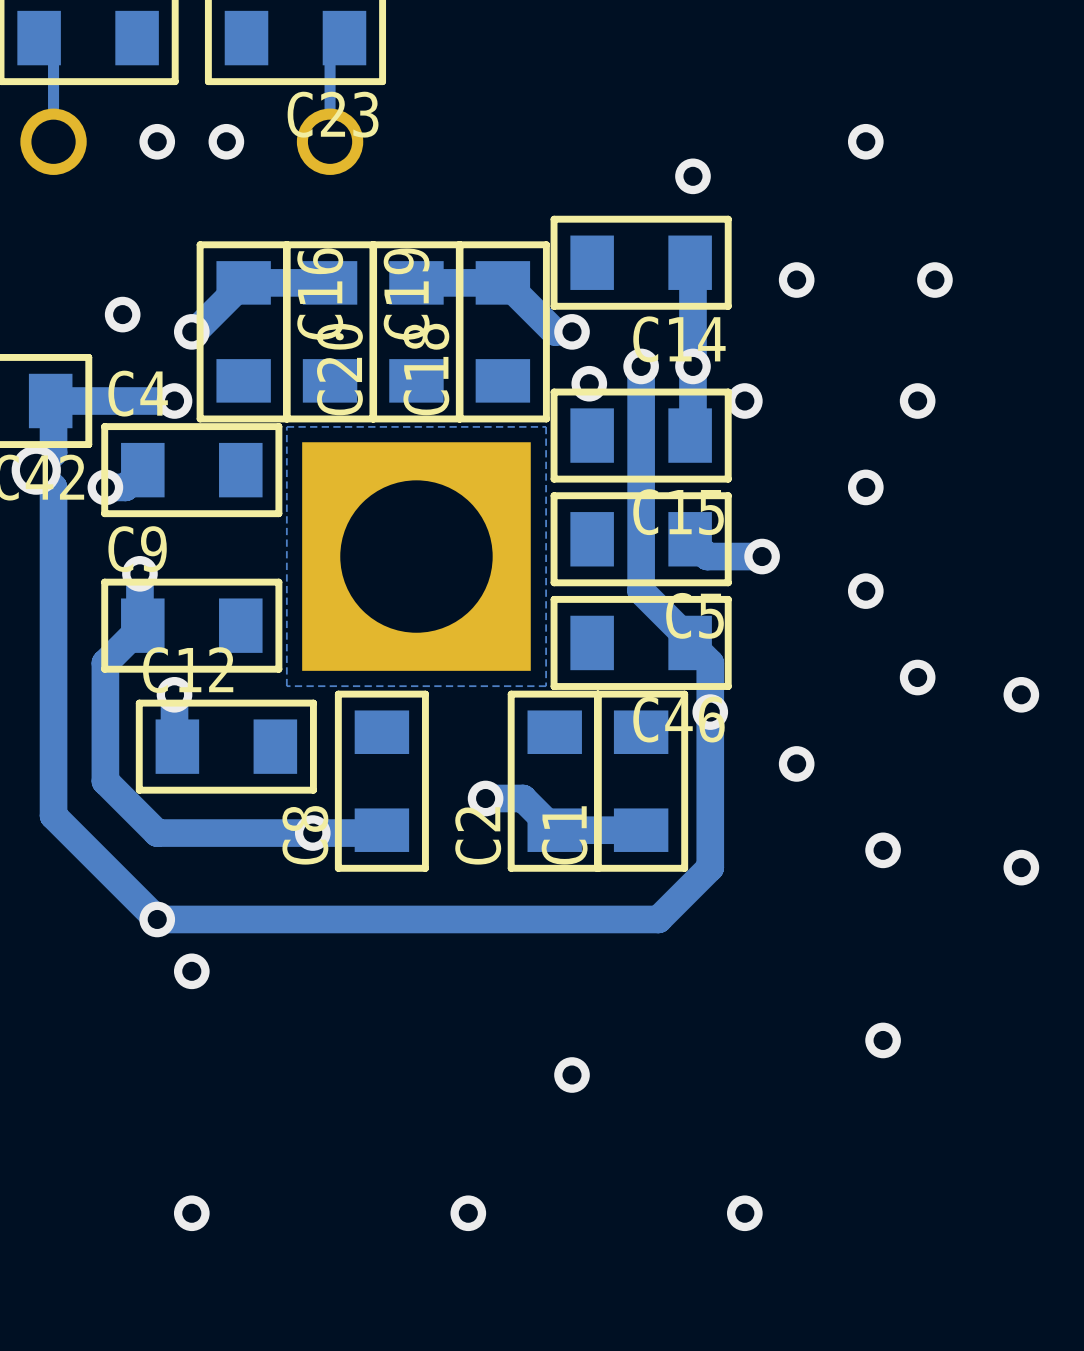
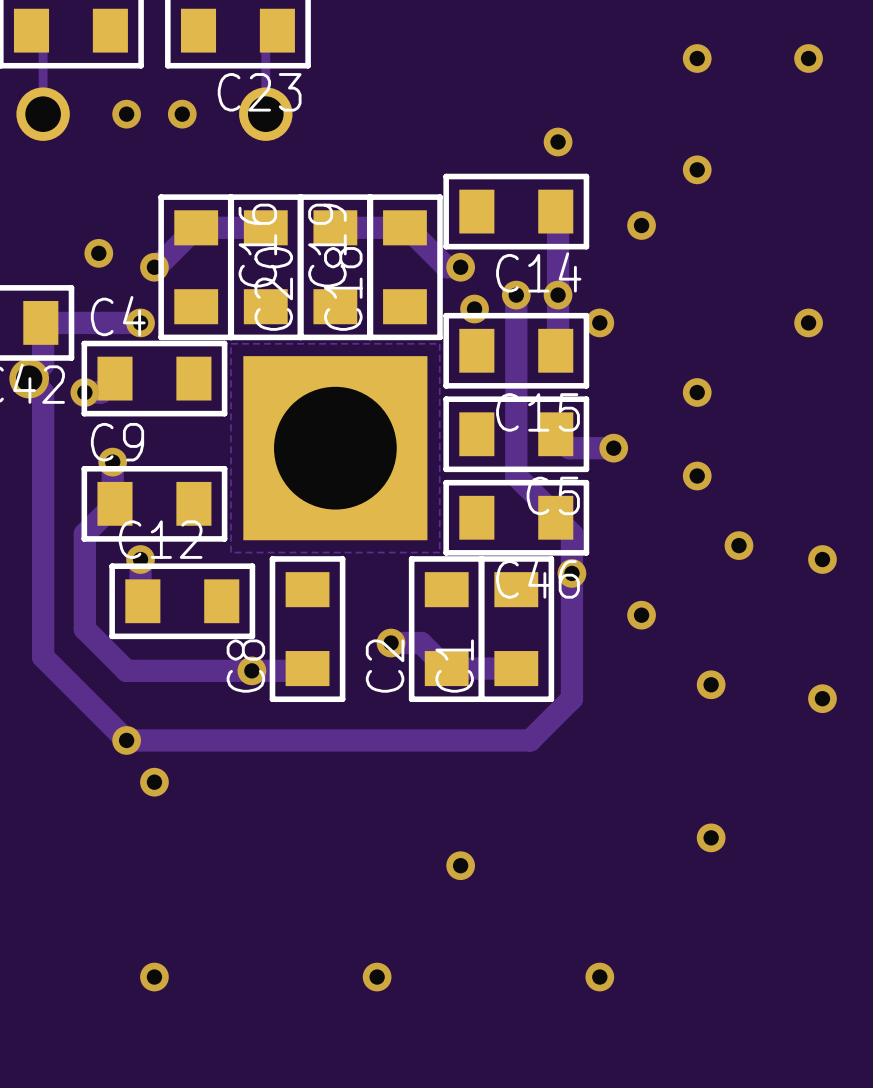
via: none -> (697, 58)
via: none -> (808, 58)
via: (865, 141) -> none
via: none -> (697, 169)
via: (934, 280) -> none
via: (917, 401) -> none
via: none -> (808, 322)

